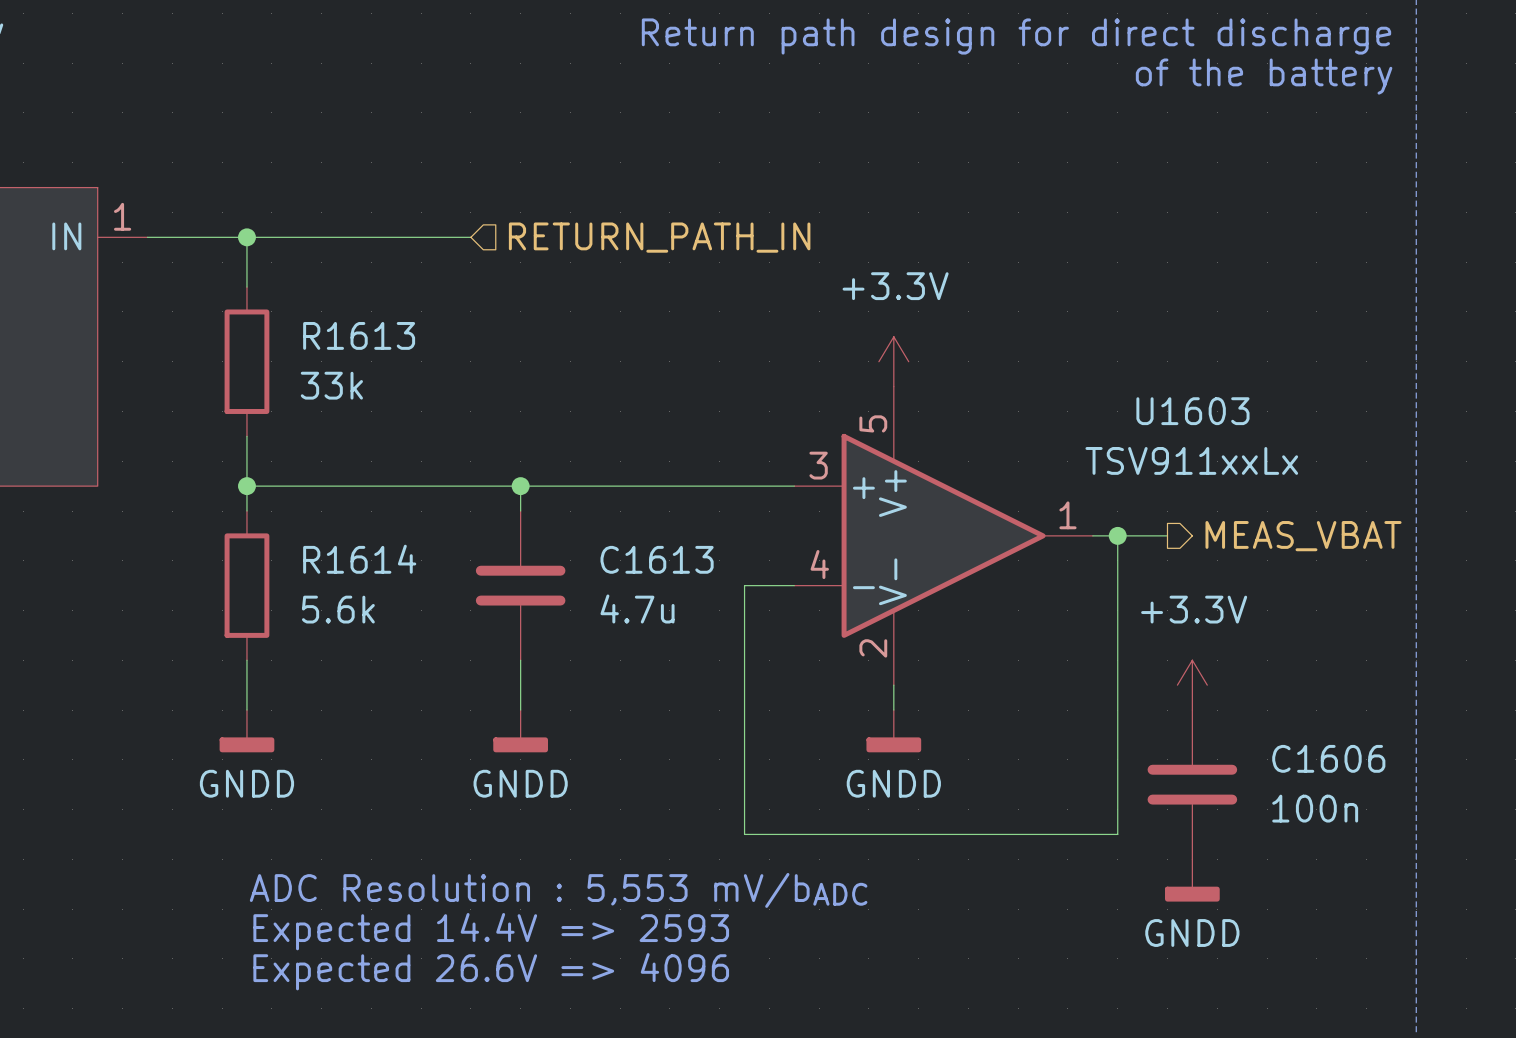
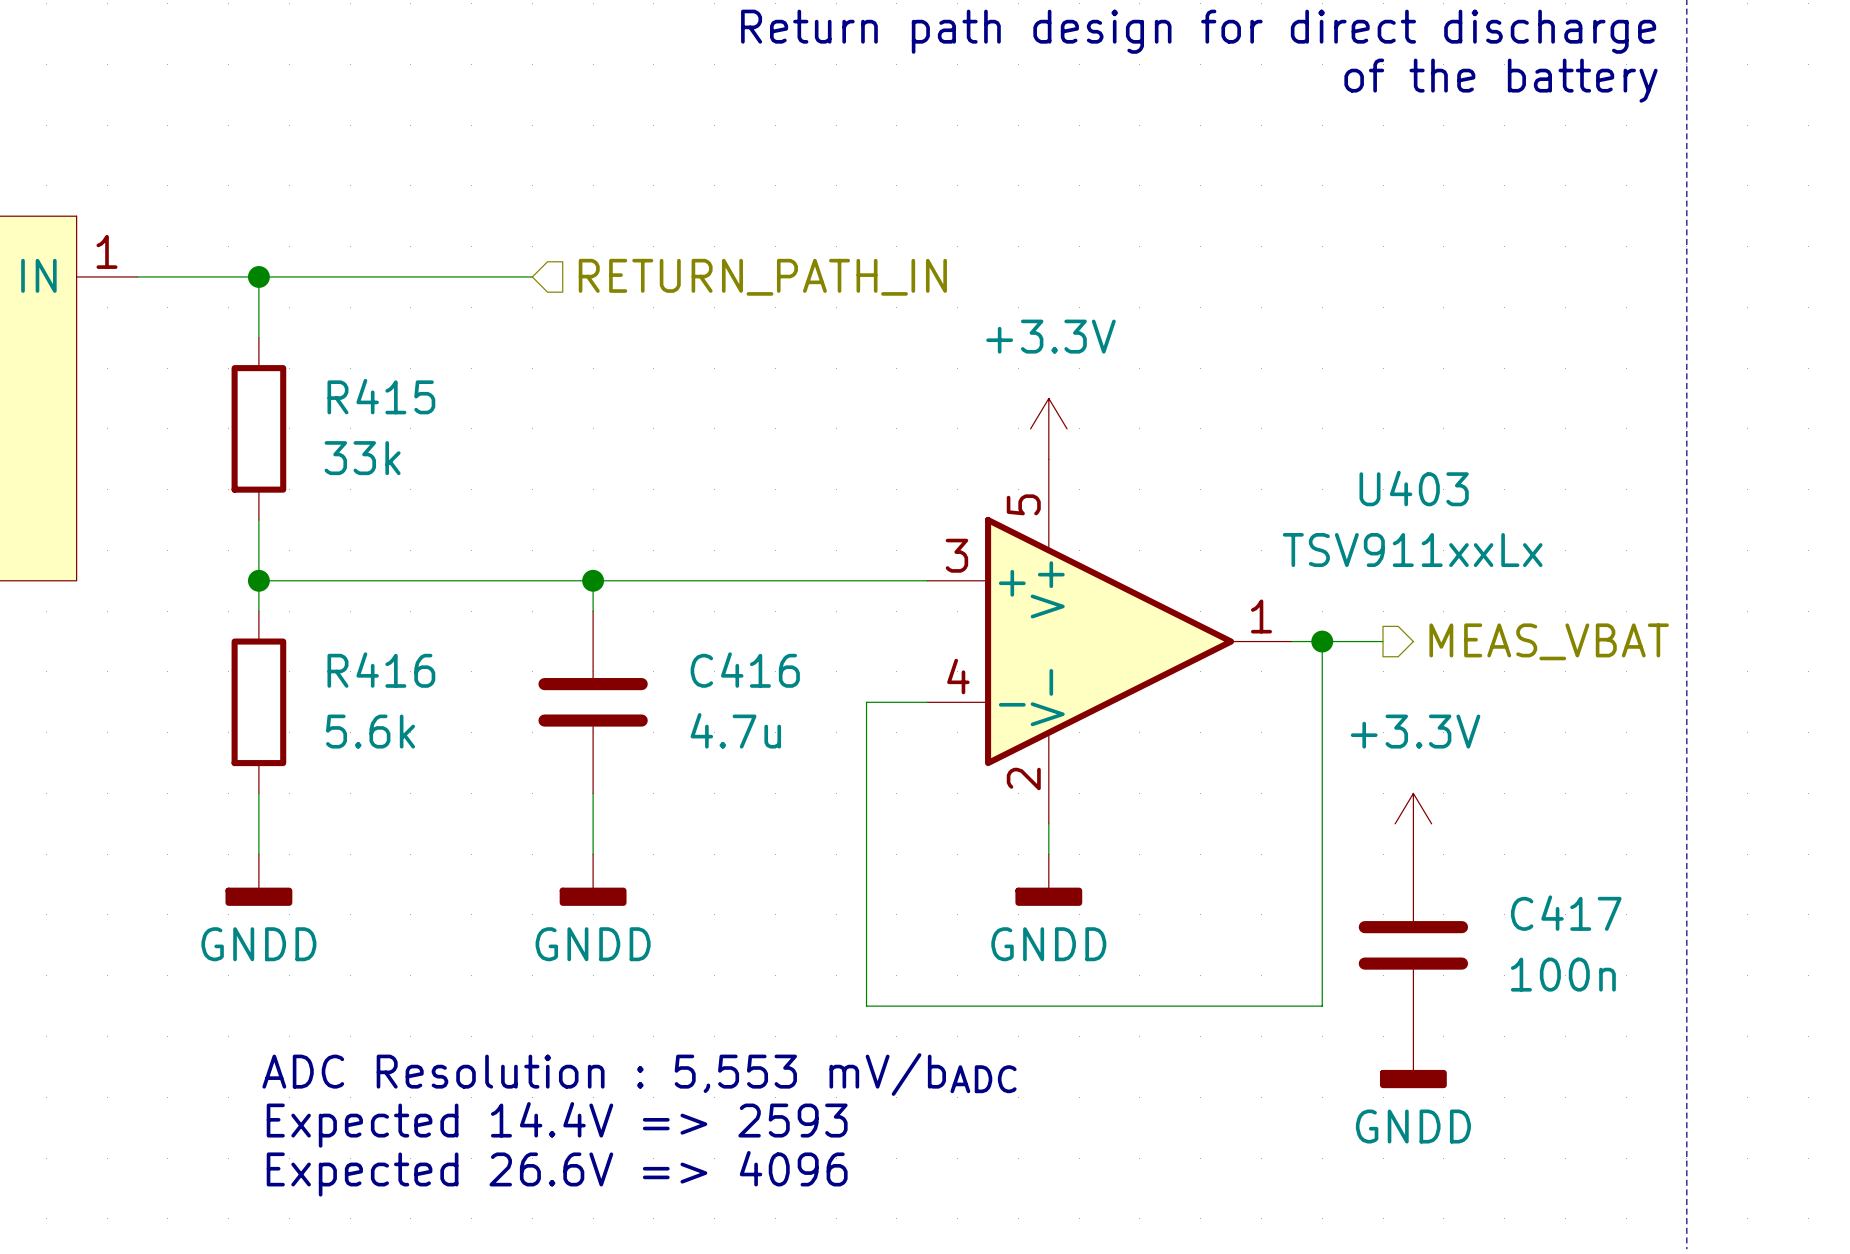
R1613 name: R1613 (359, 335) -> R415 (381, 396)
U1603 name: U1603 (1192, 411) -> U403 (1414, 488)
R1614 name: R1614 (359, 559) -> R416 (381, 670)
C1613 name: C1613 (657, 559) -> C416 (745, 670)
C1606 name: C1606 (1328, 758) -> C417 (1566, 913)

